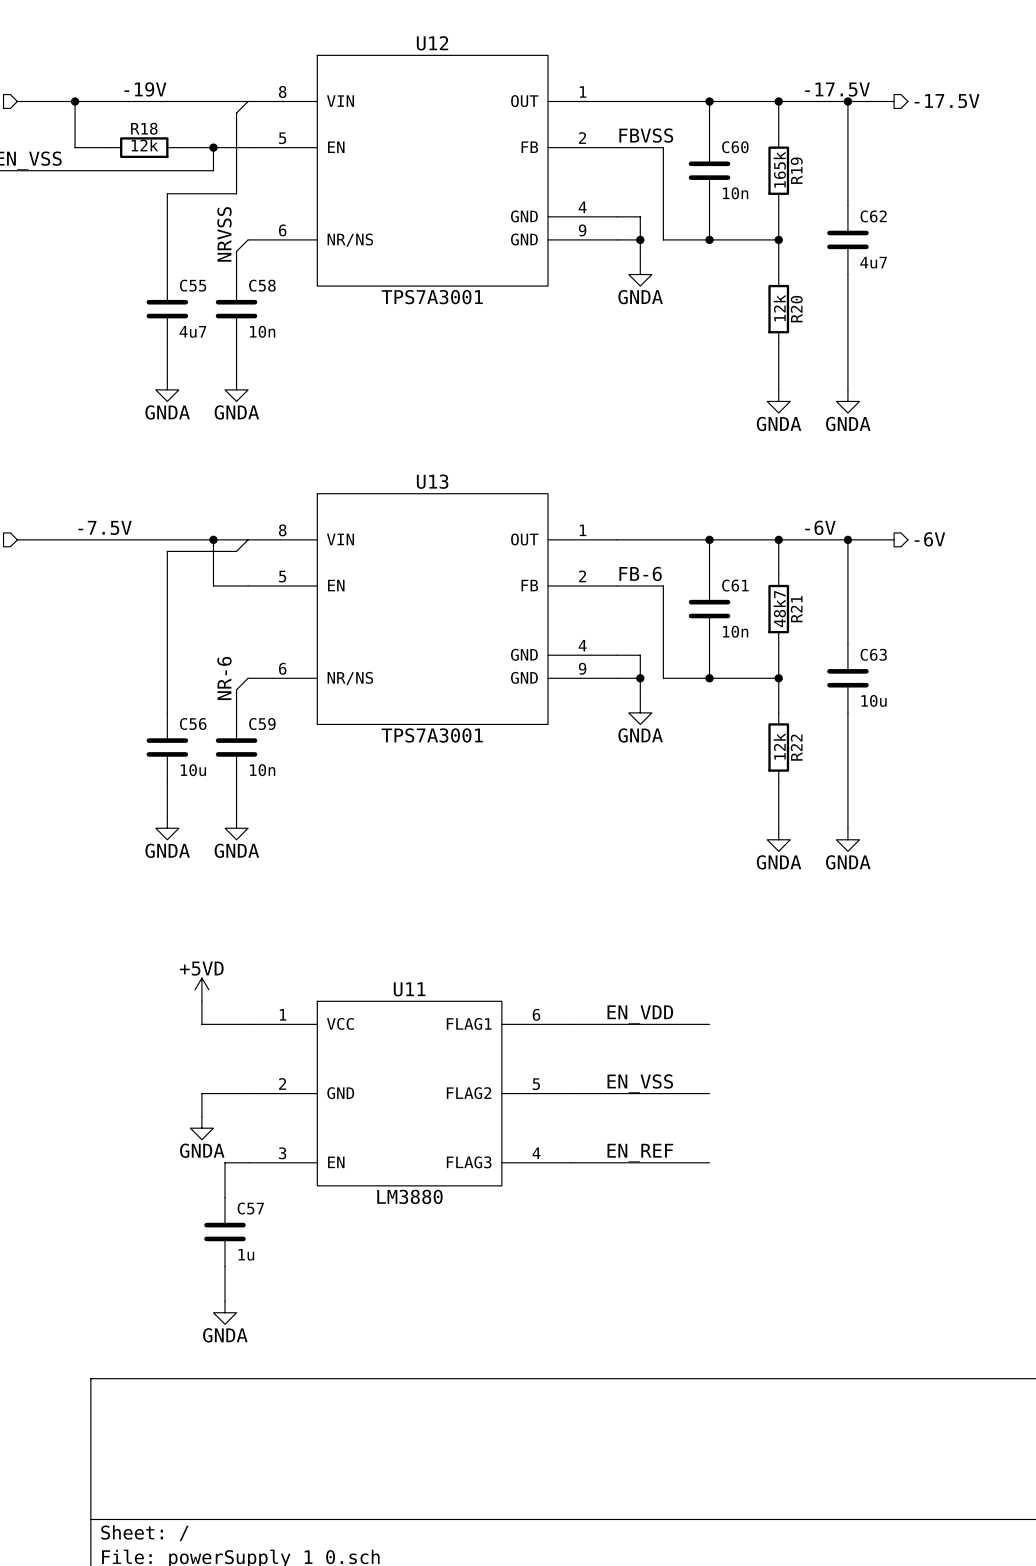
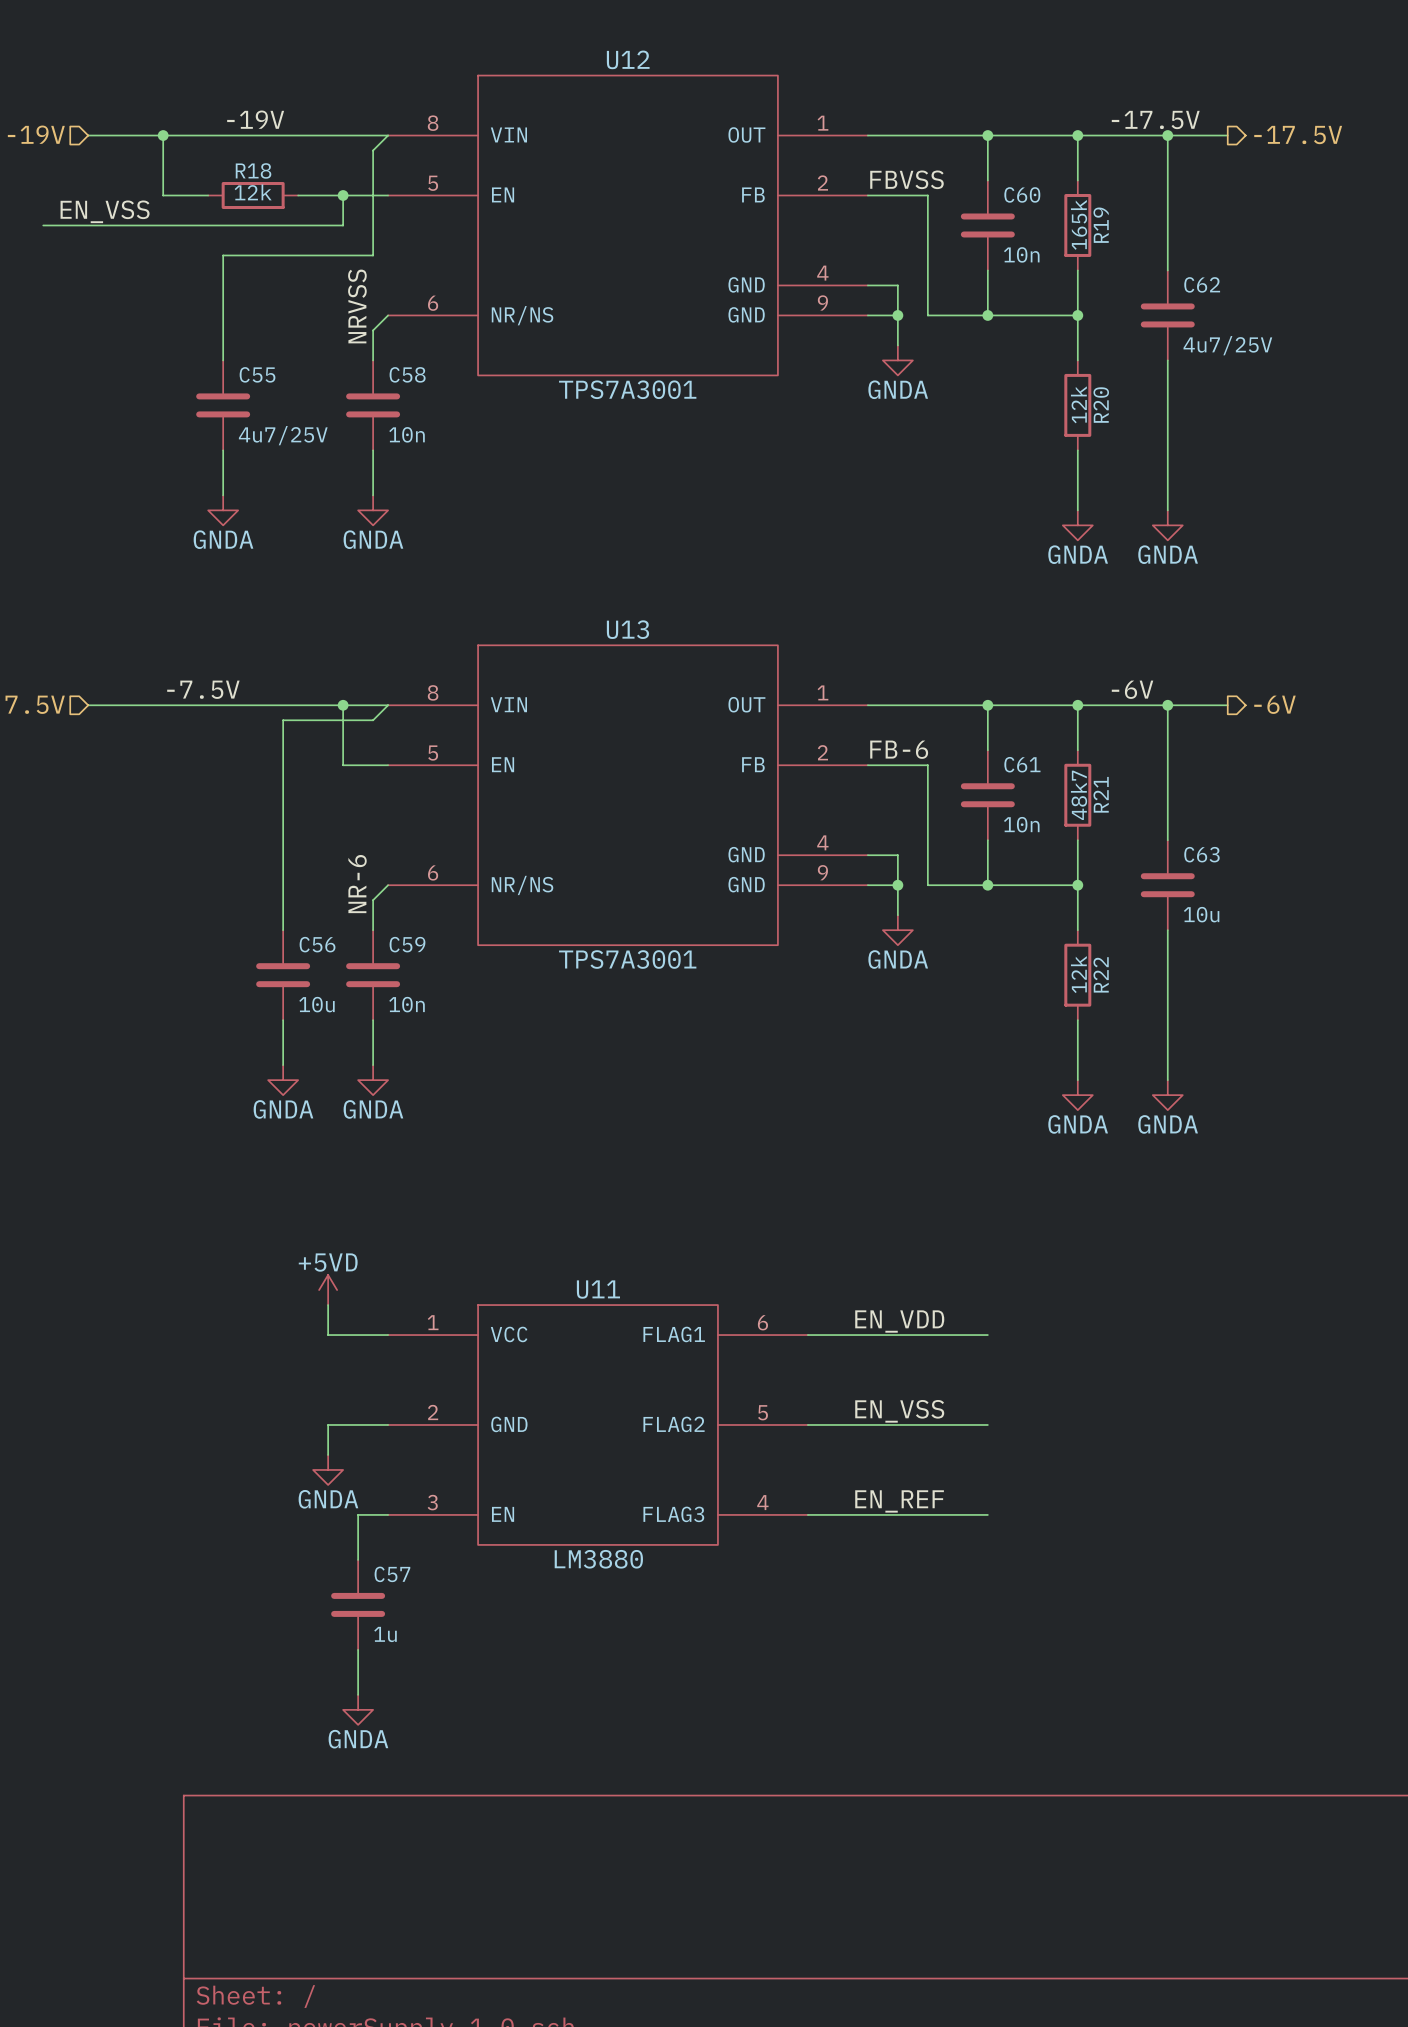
wire: (167, 193) (167, 274) -> (283, 255) (223, 255) (223, 360)
C62 value: 4u7 (873, 262) -> 4u7/25V (1227, 345)
C55 position: (167, 309) -> (223, 405)
C55 value: 4u7 (192, 331) -> 4u7/25V (283, 435)
wire: (167, 343) (167, 378) -> (223, 450) (223, 495)
power symbol position: GNDA (167, 389) -> GNDA (223, 510)

